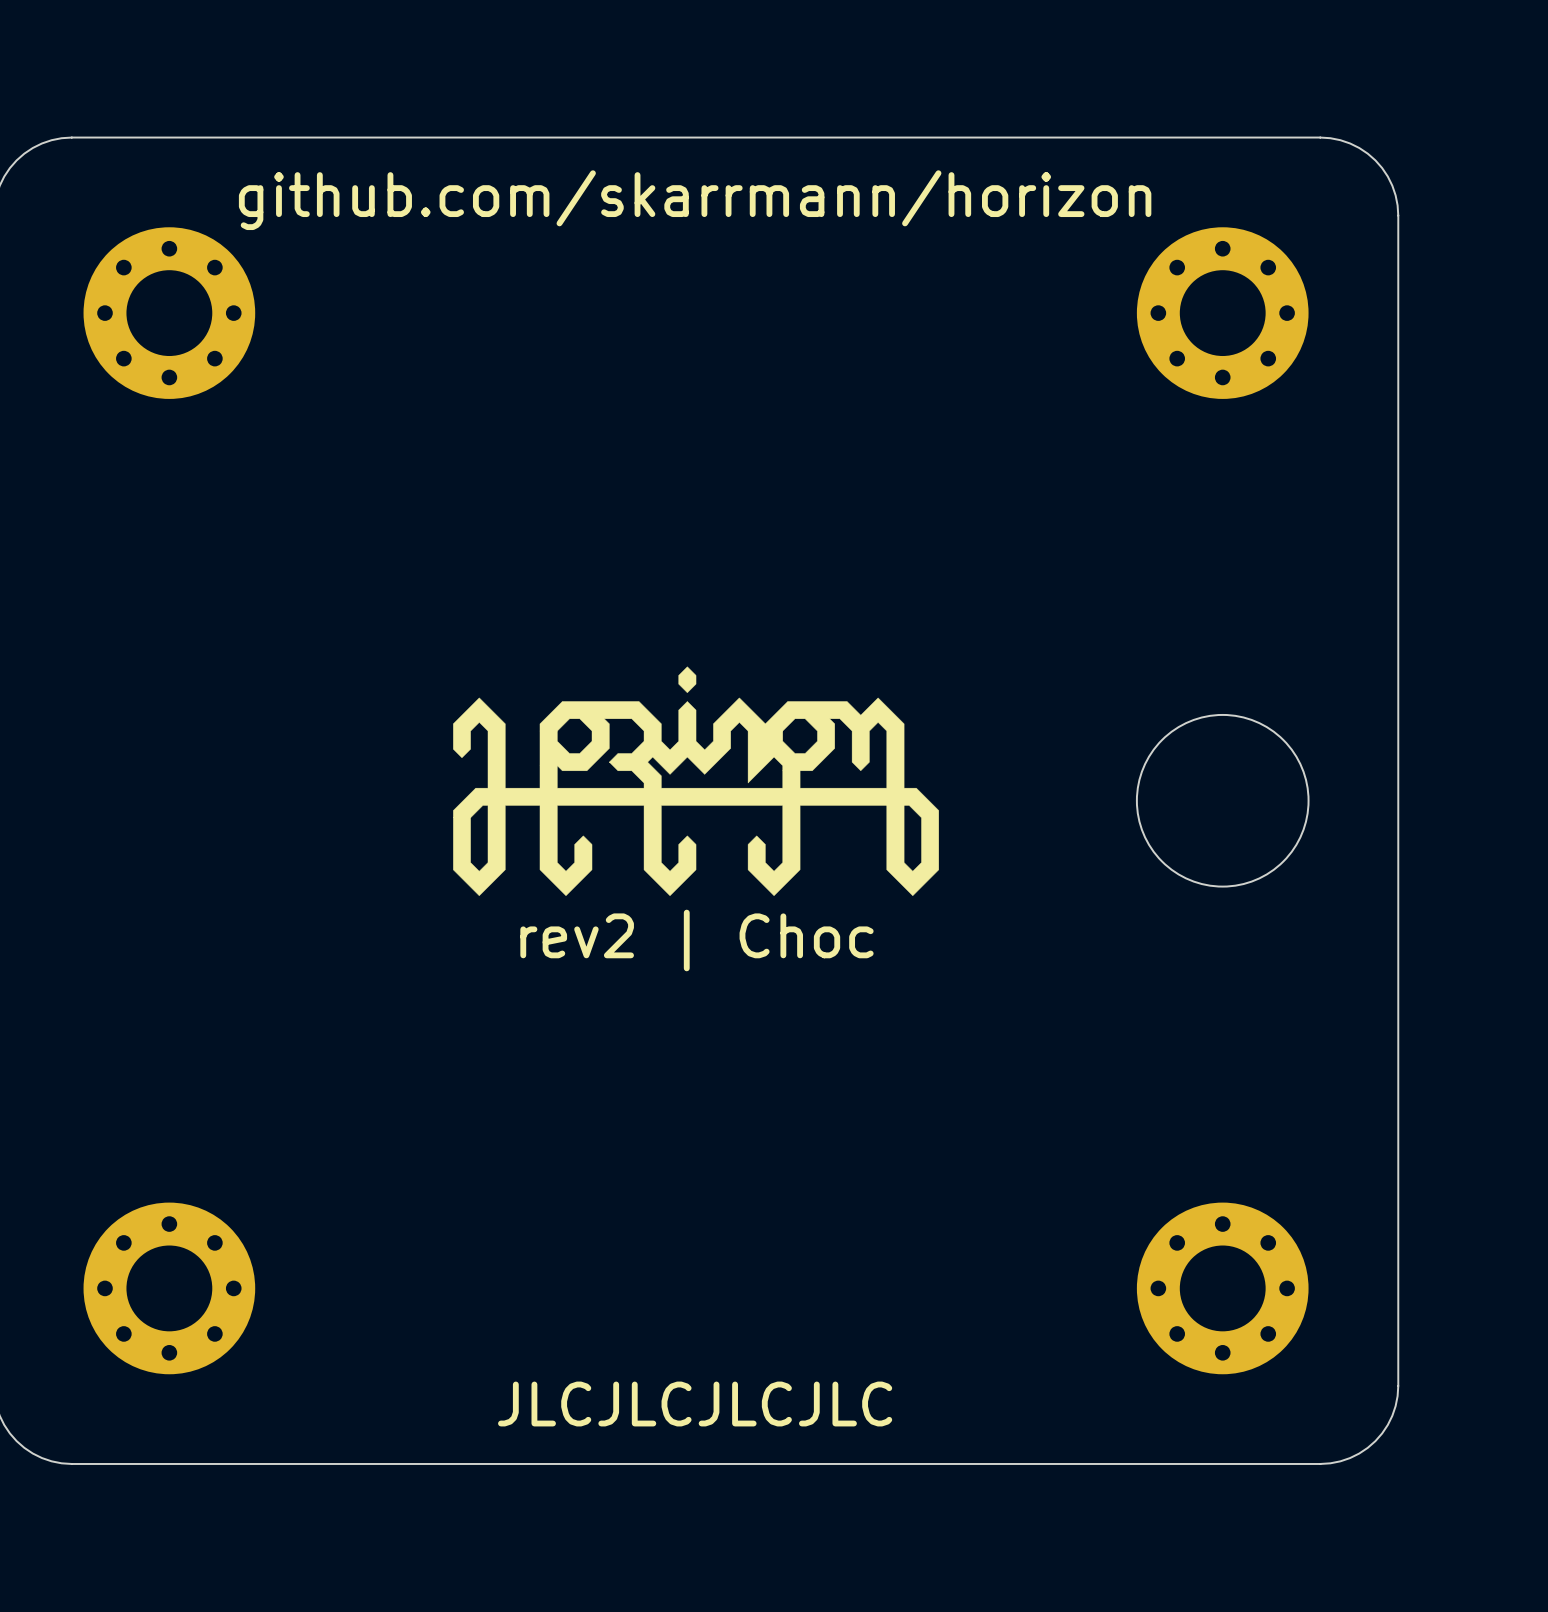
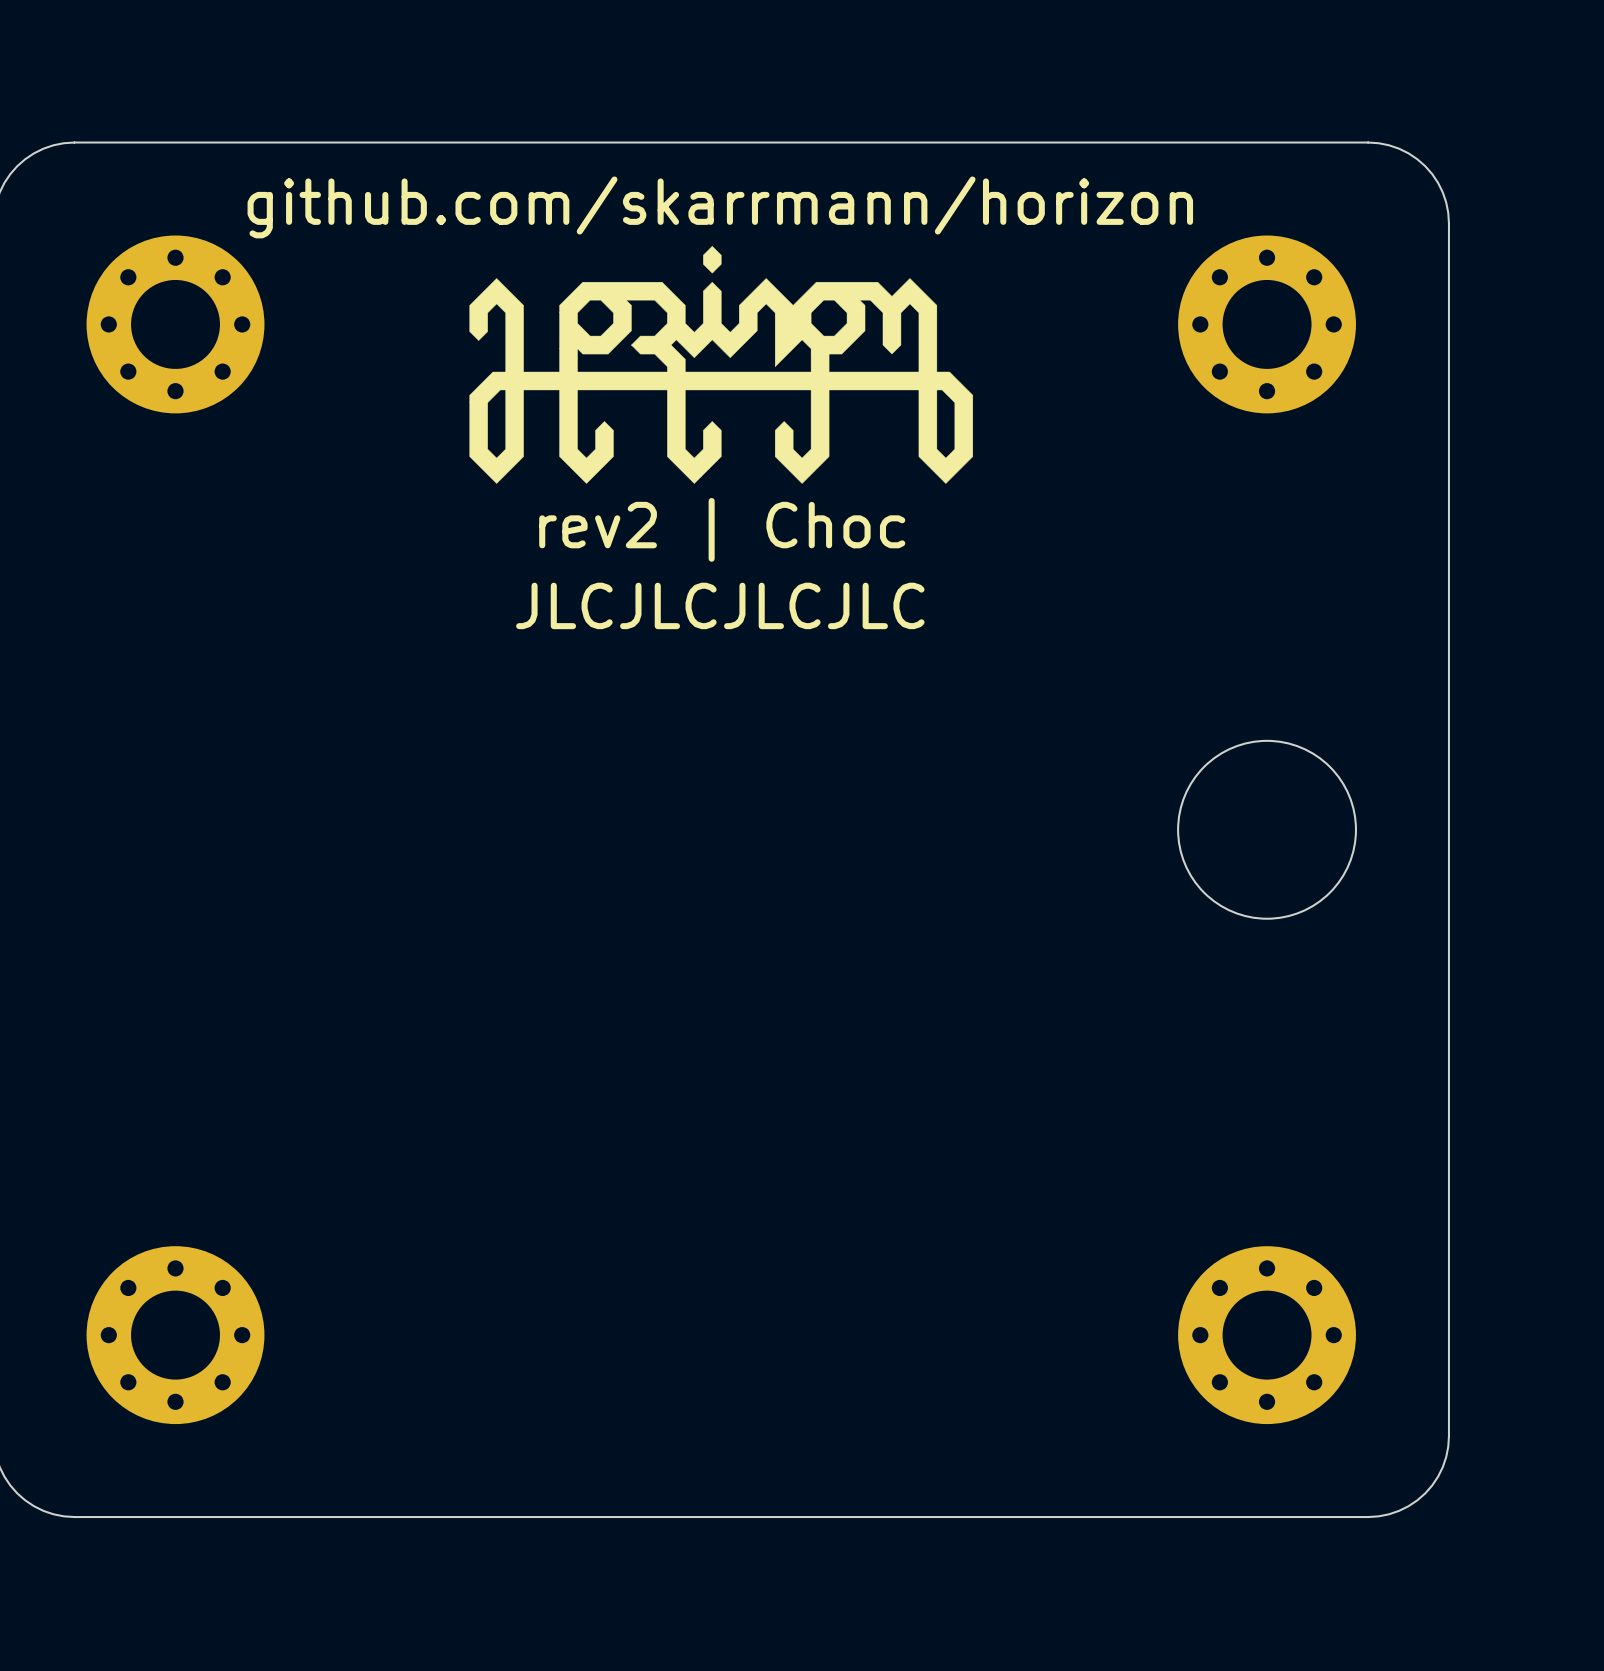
drawing position: (696, 781) -> (721, 364)
text position: rev2 | Choc (696, 940) -> rev2 | Choc (722, 529)
text position: JLCJLCJLCJLC (695, 1404) -> JLCJLCJLCJLC (720, 605)

